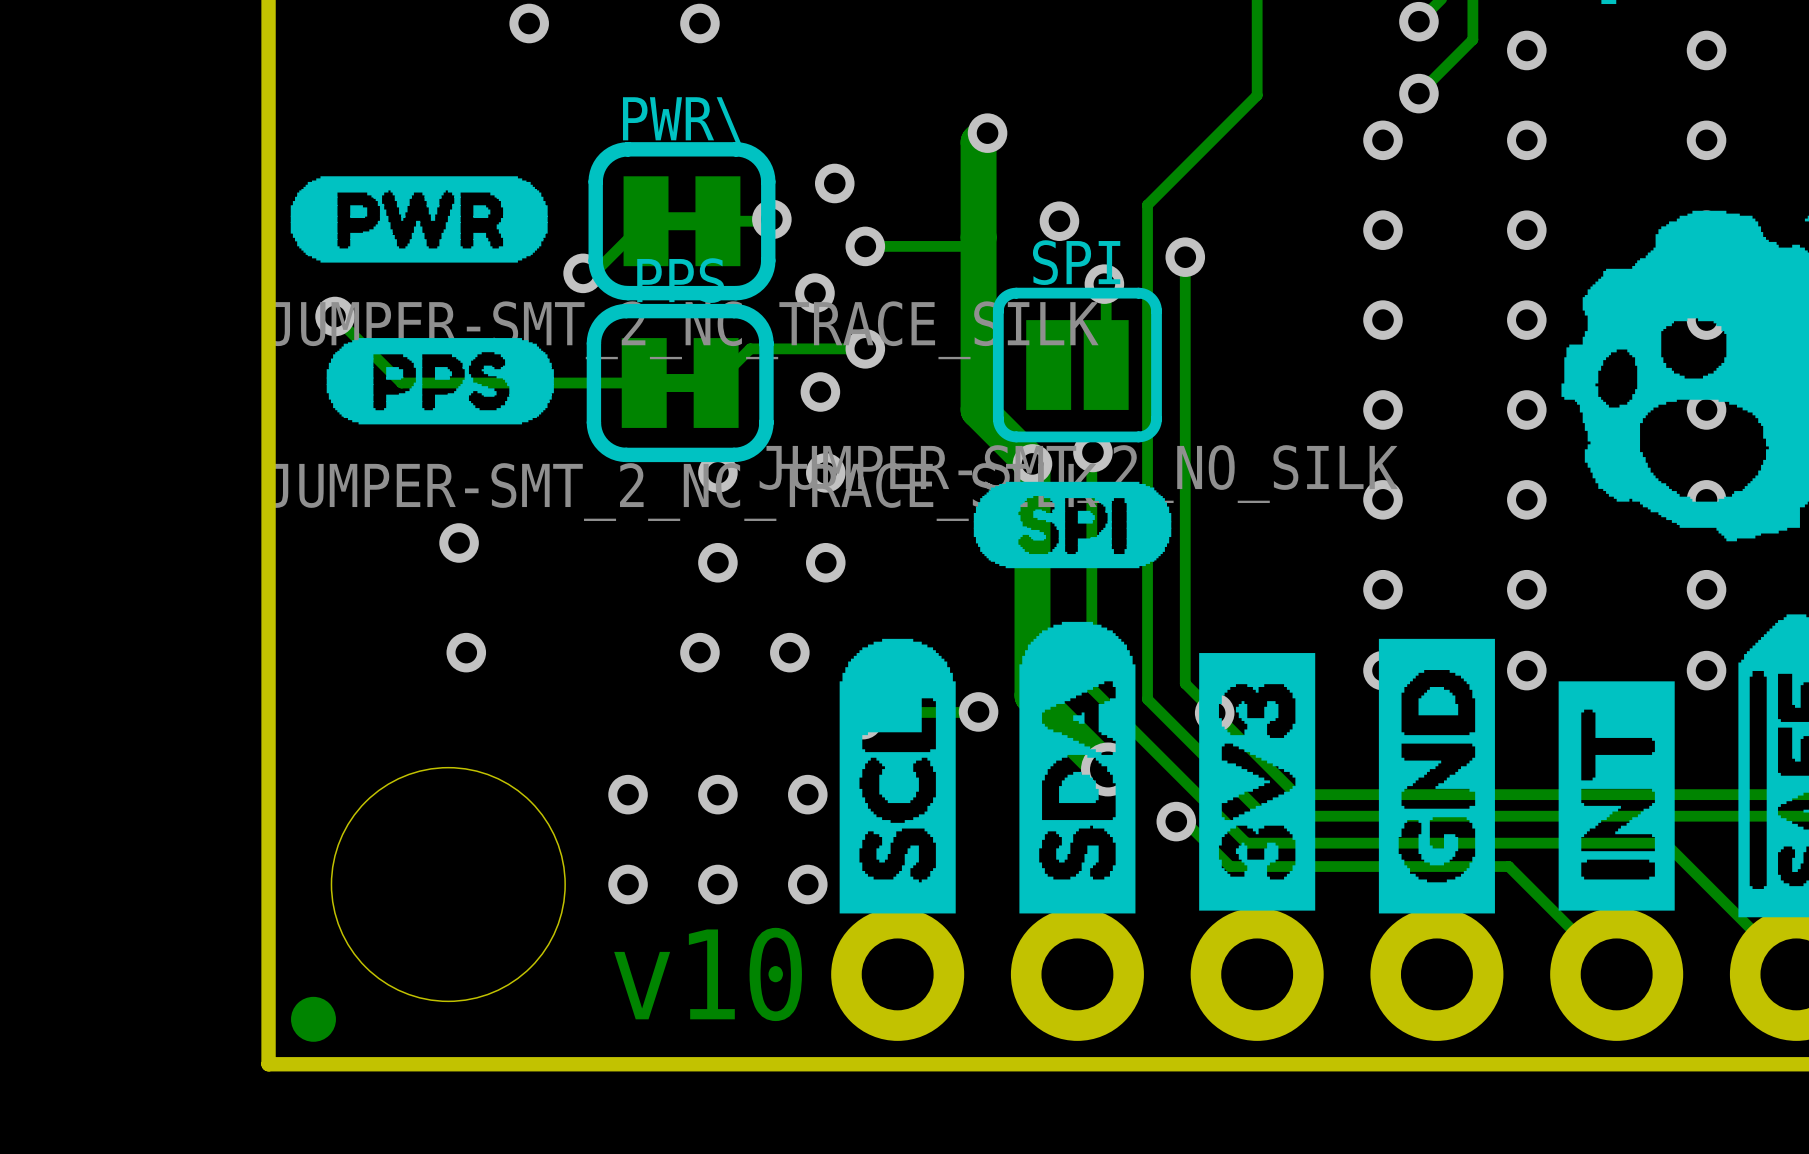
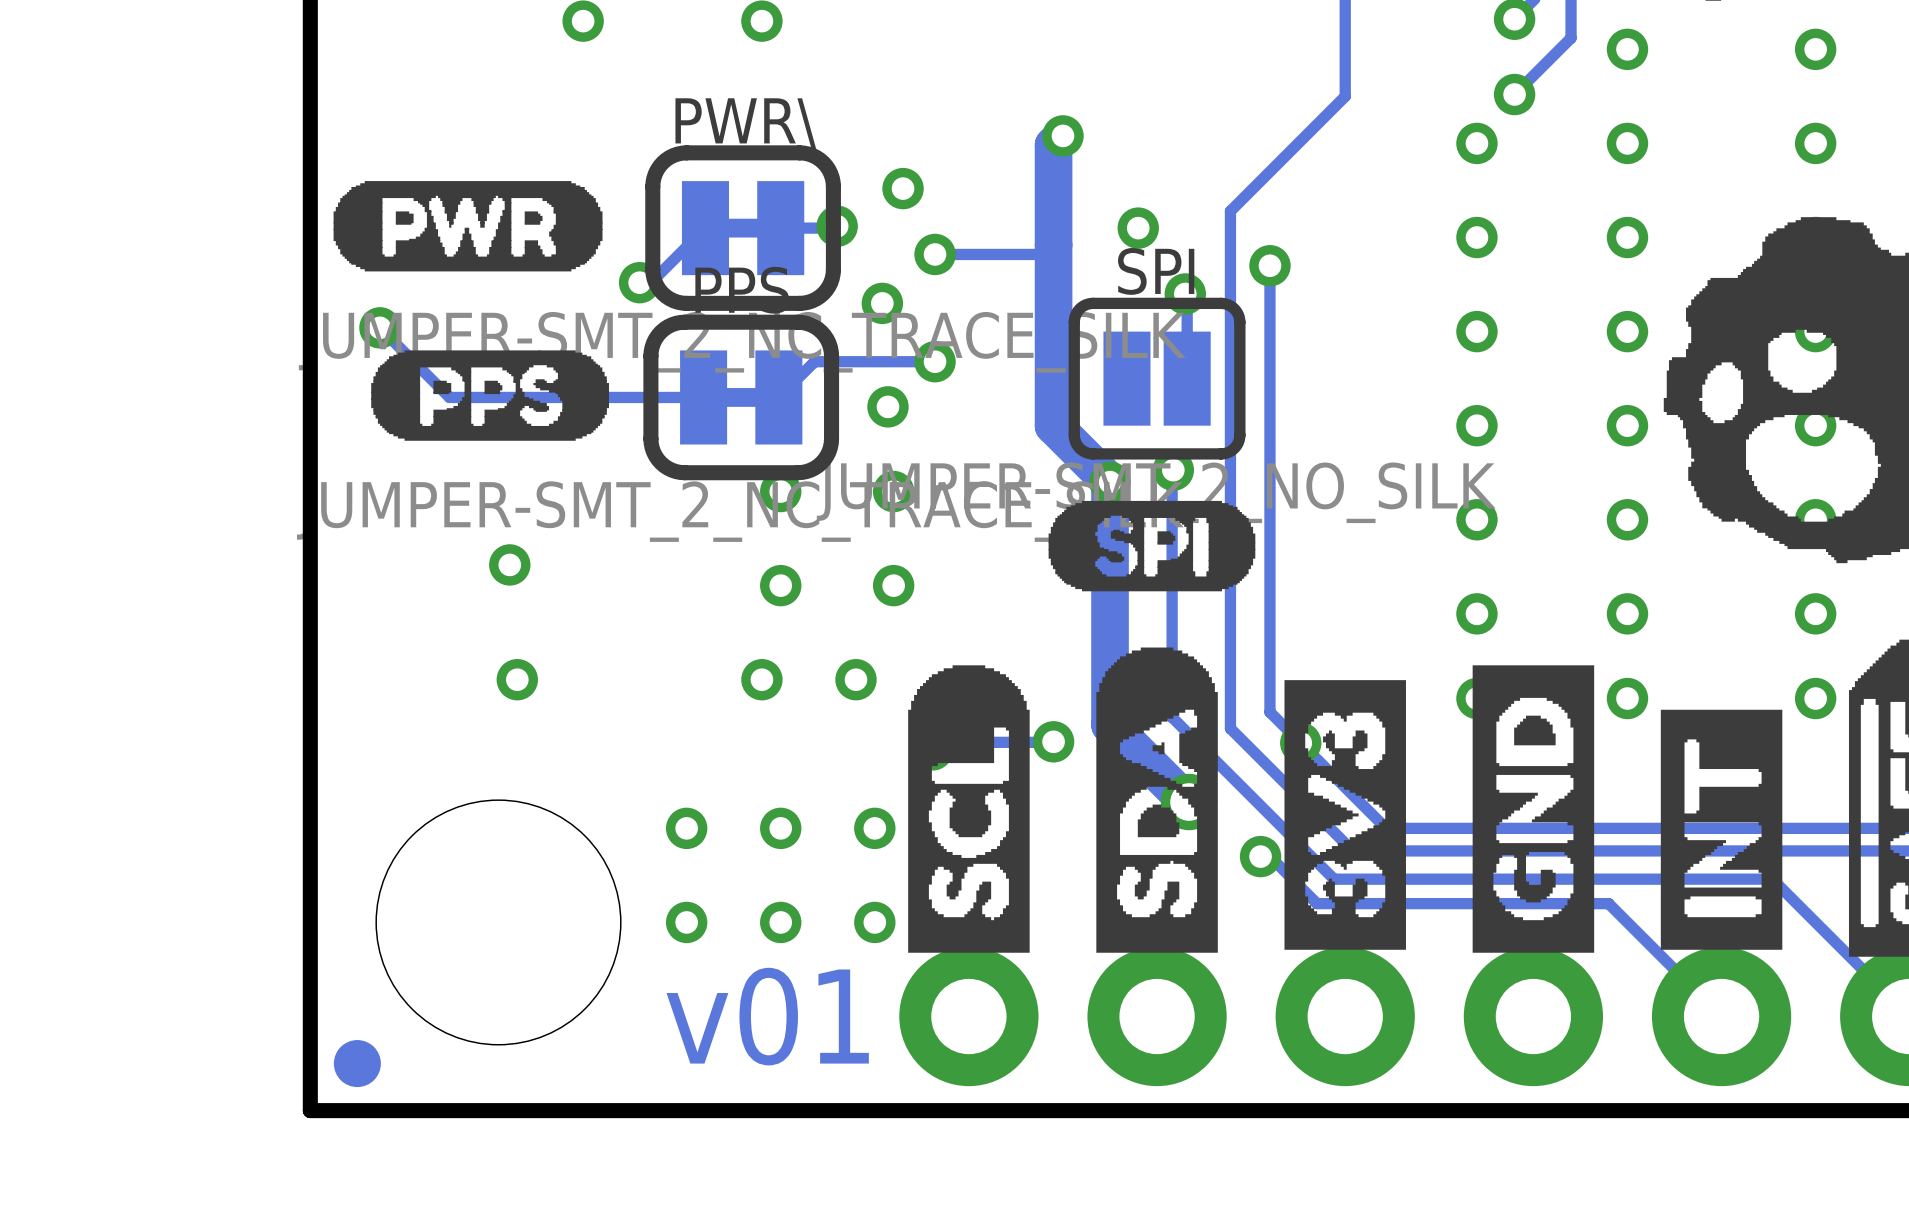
text: v10 (708, 974) -> v01 (767, 1016)

